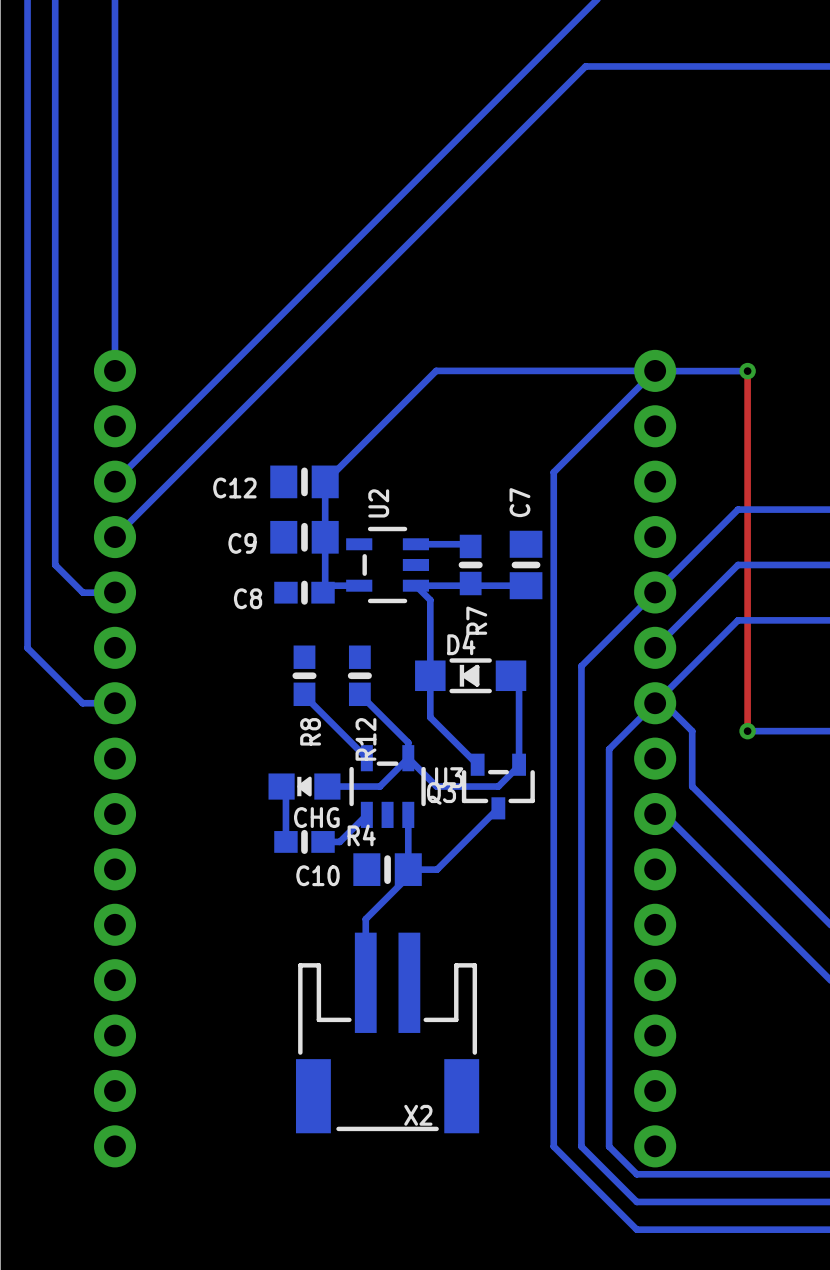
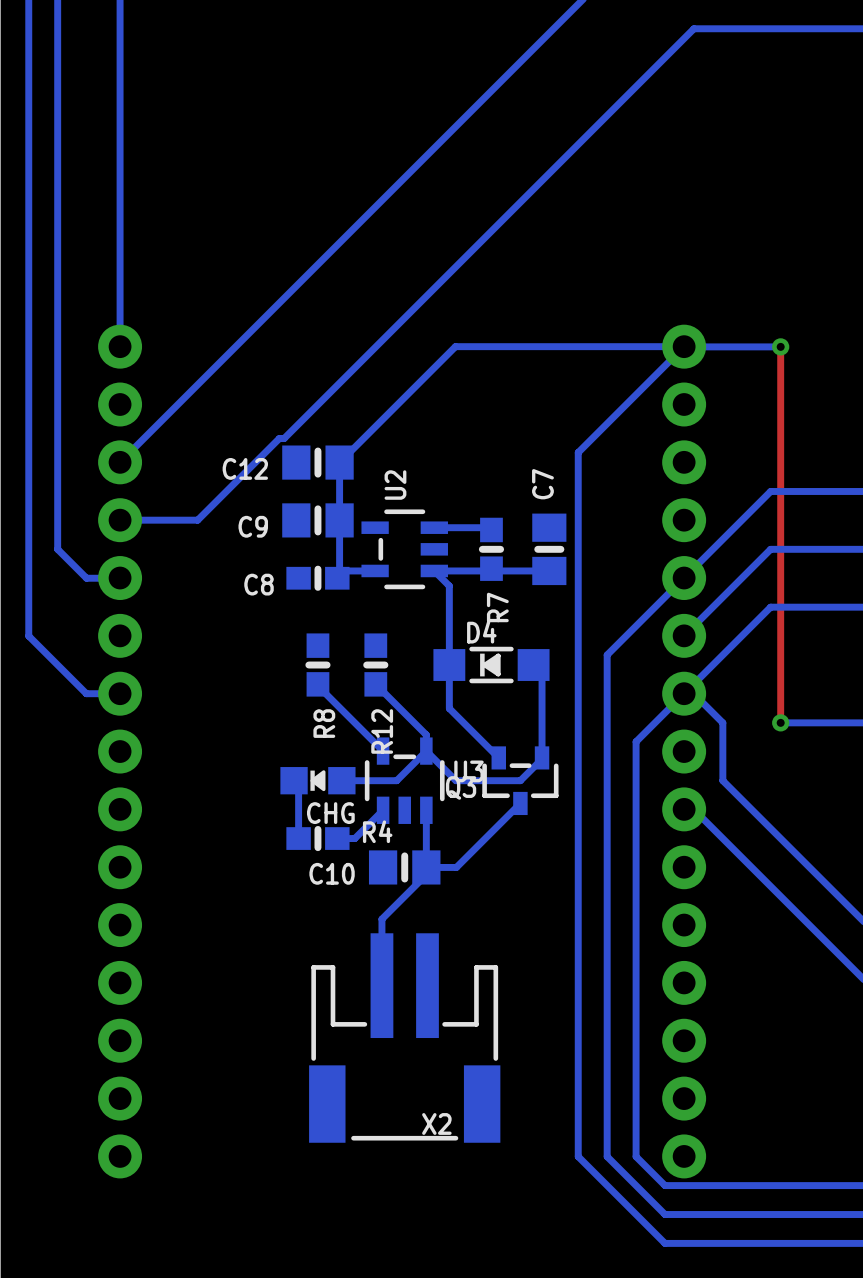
bottom track: (664, 66) (585, 66) (114, 537) -> (693, 28) (284, 438) (279, 438) (197, 520) (120, 520)

